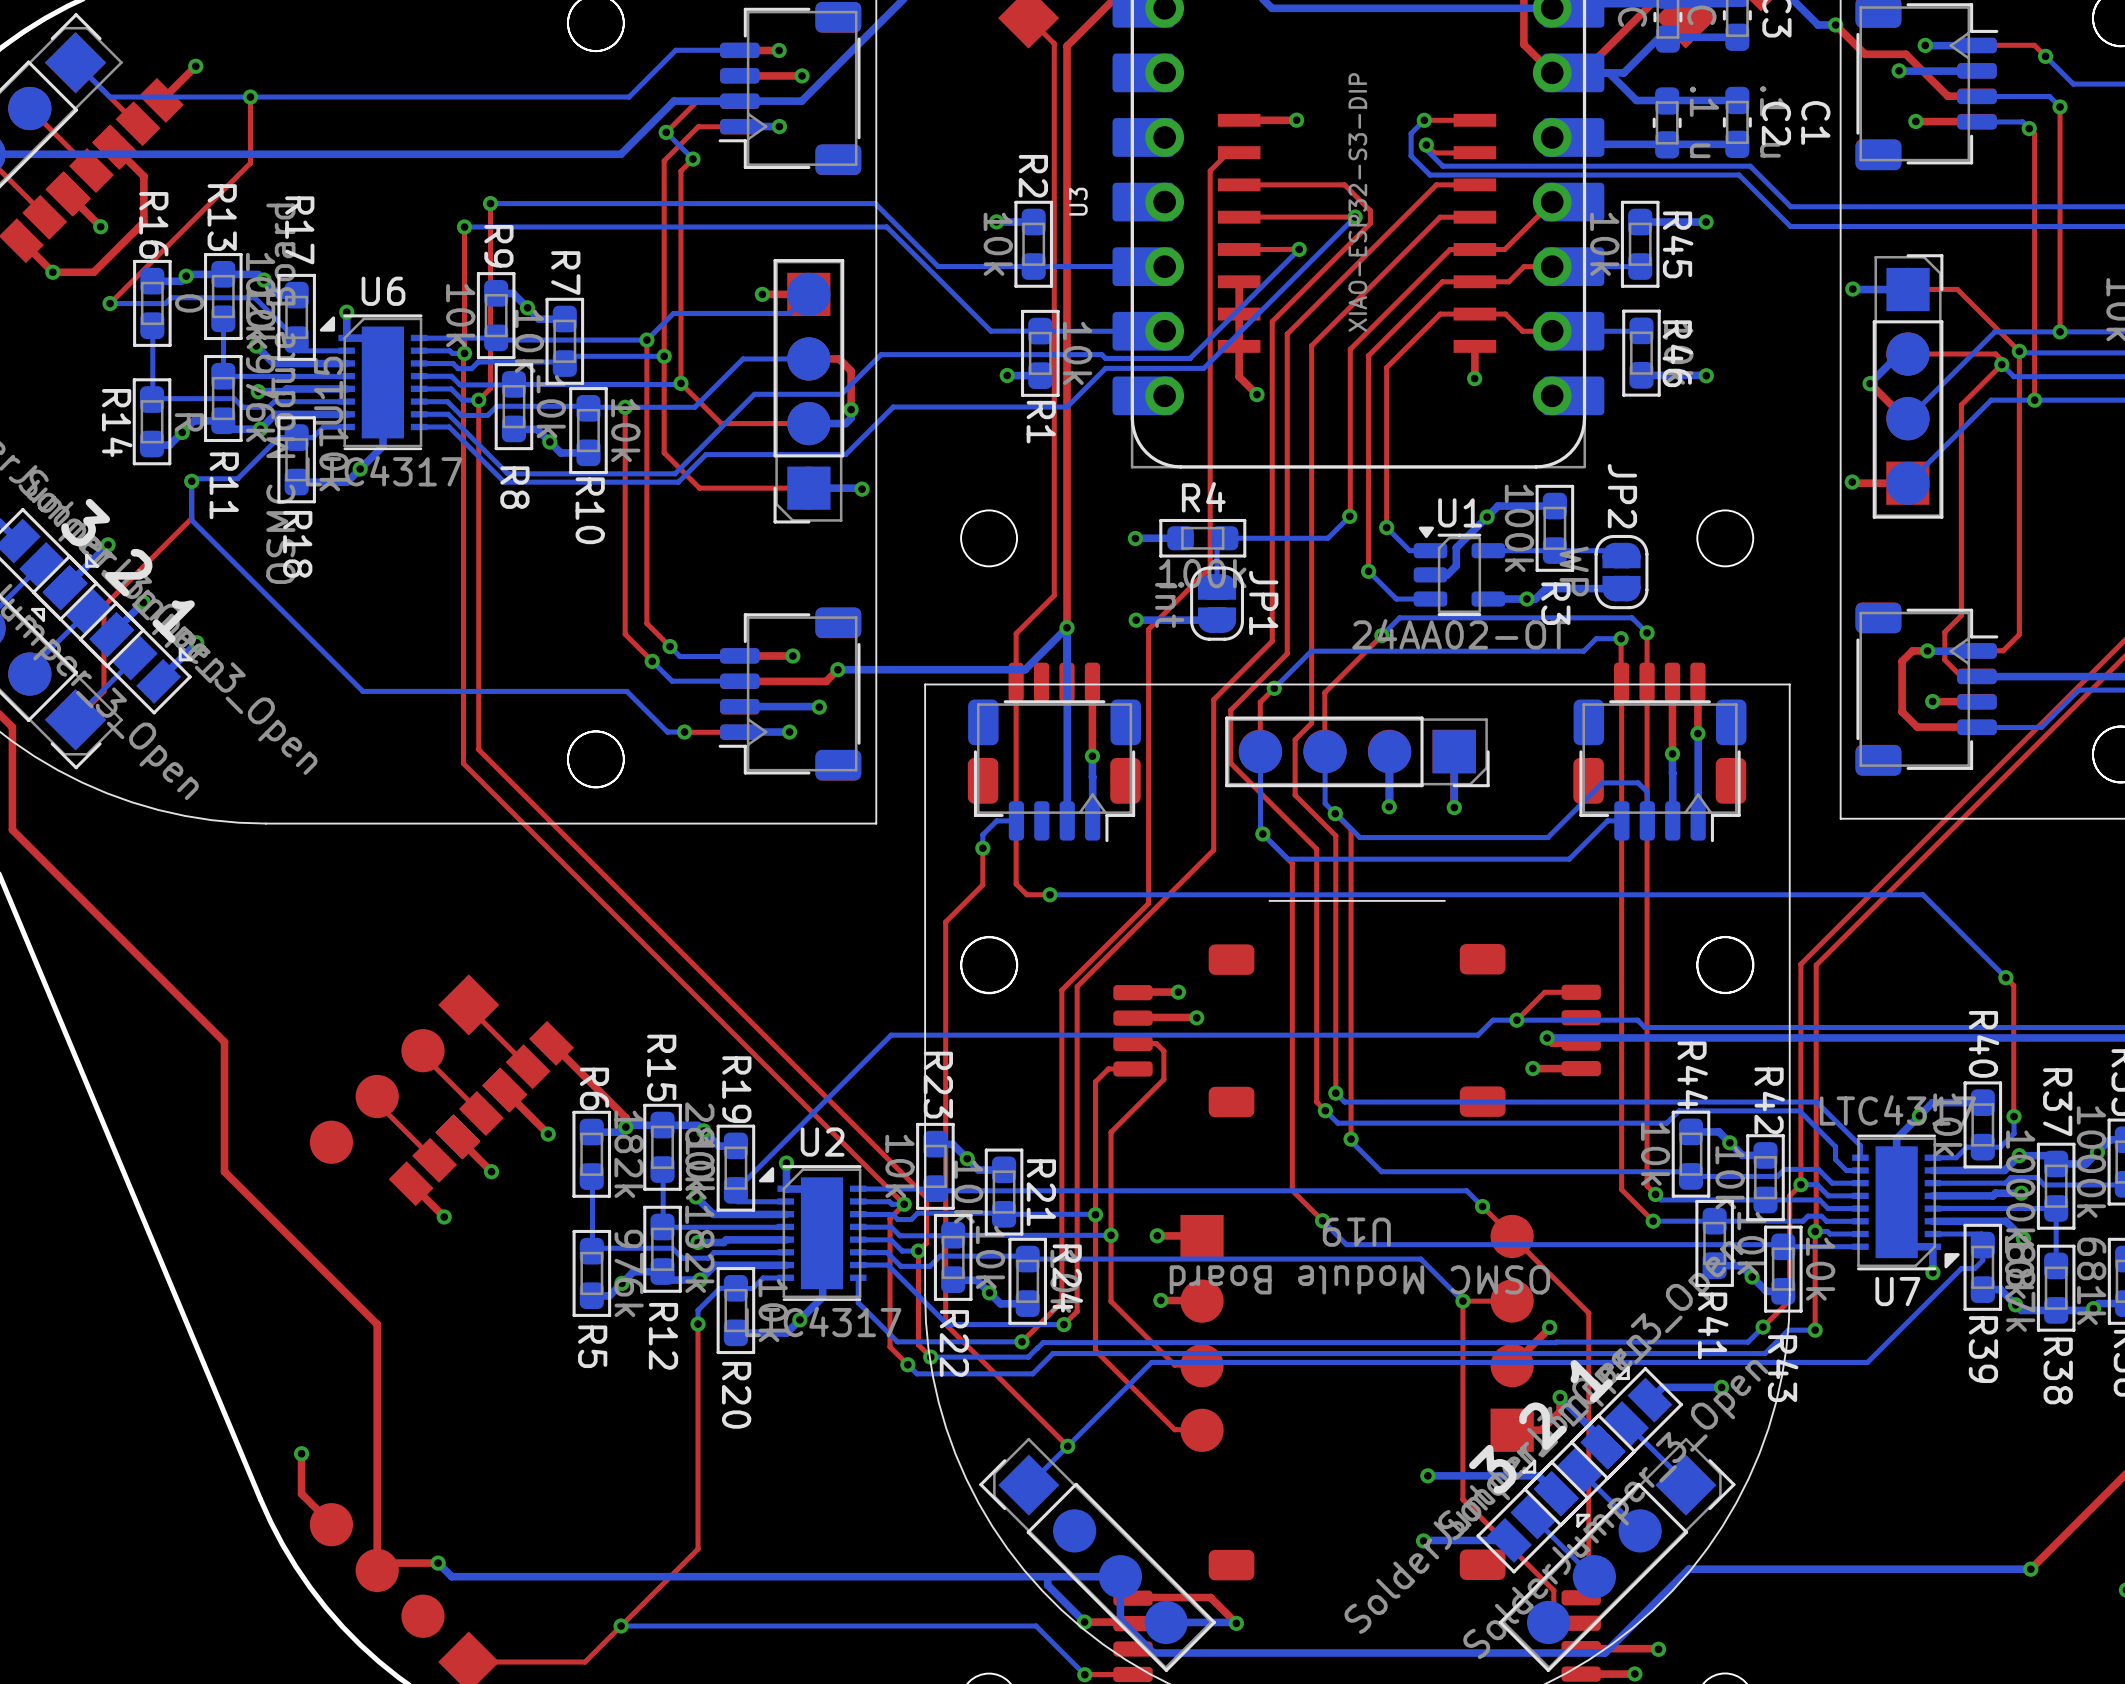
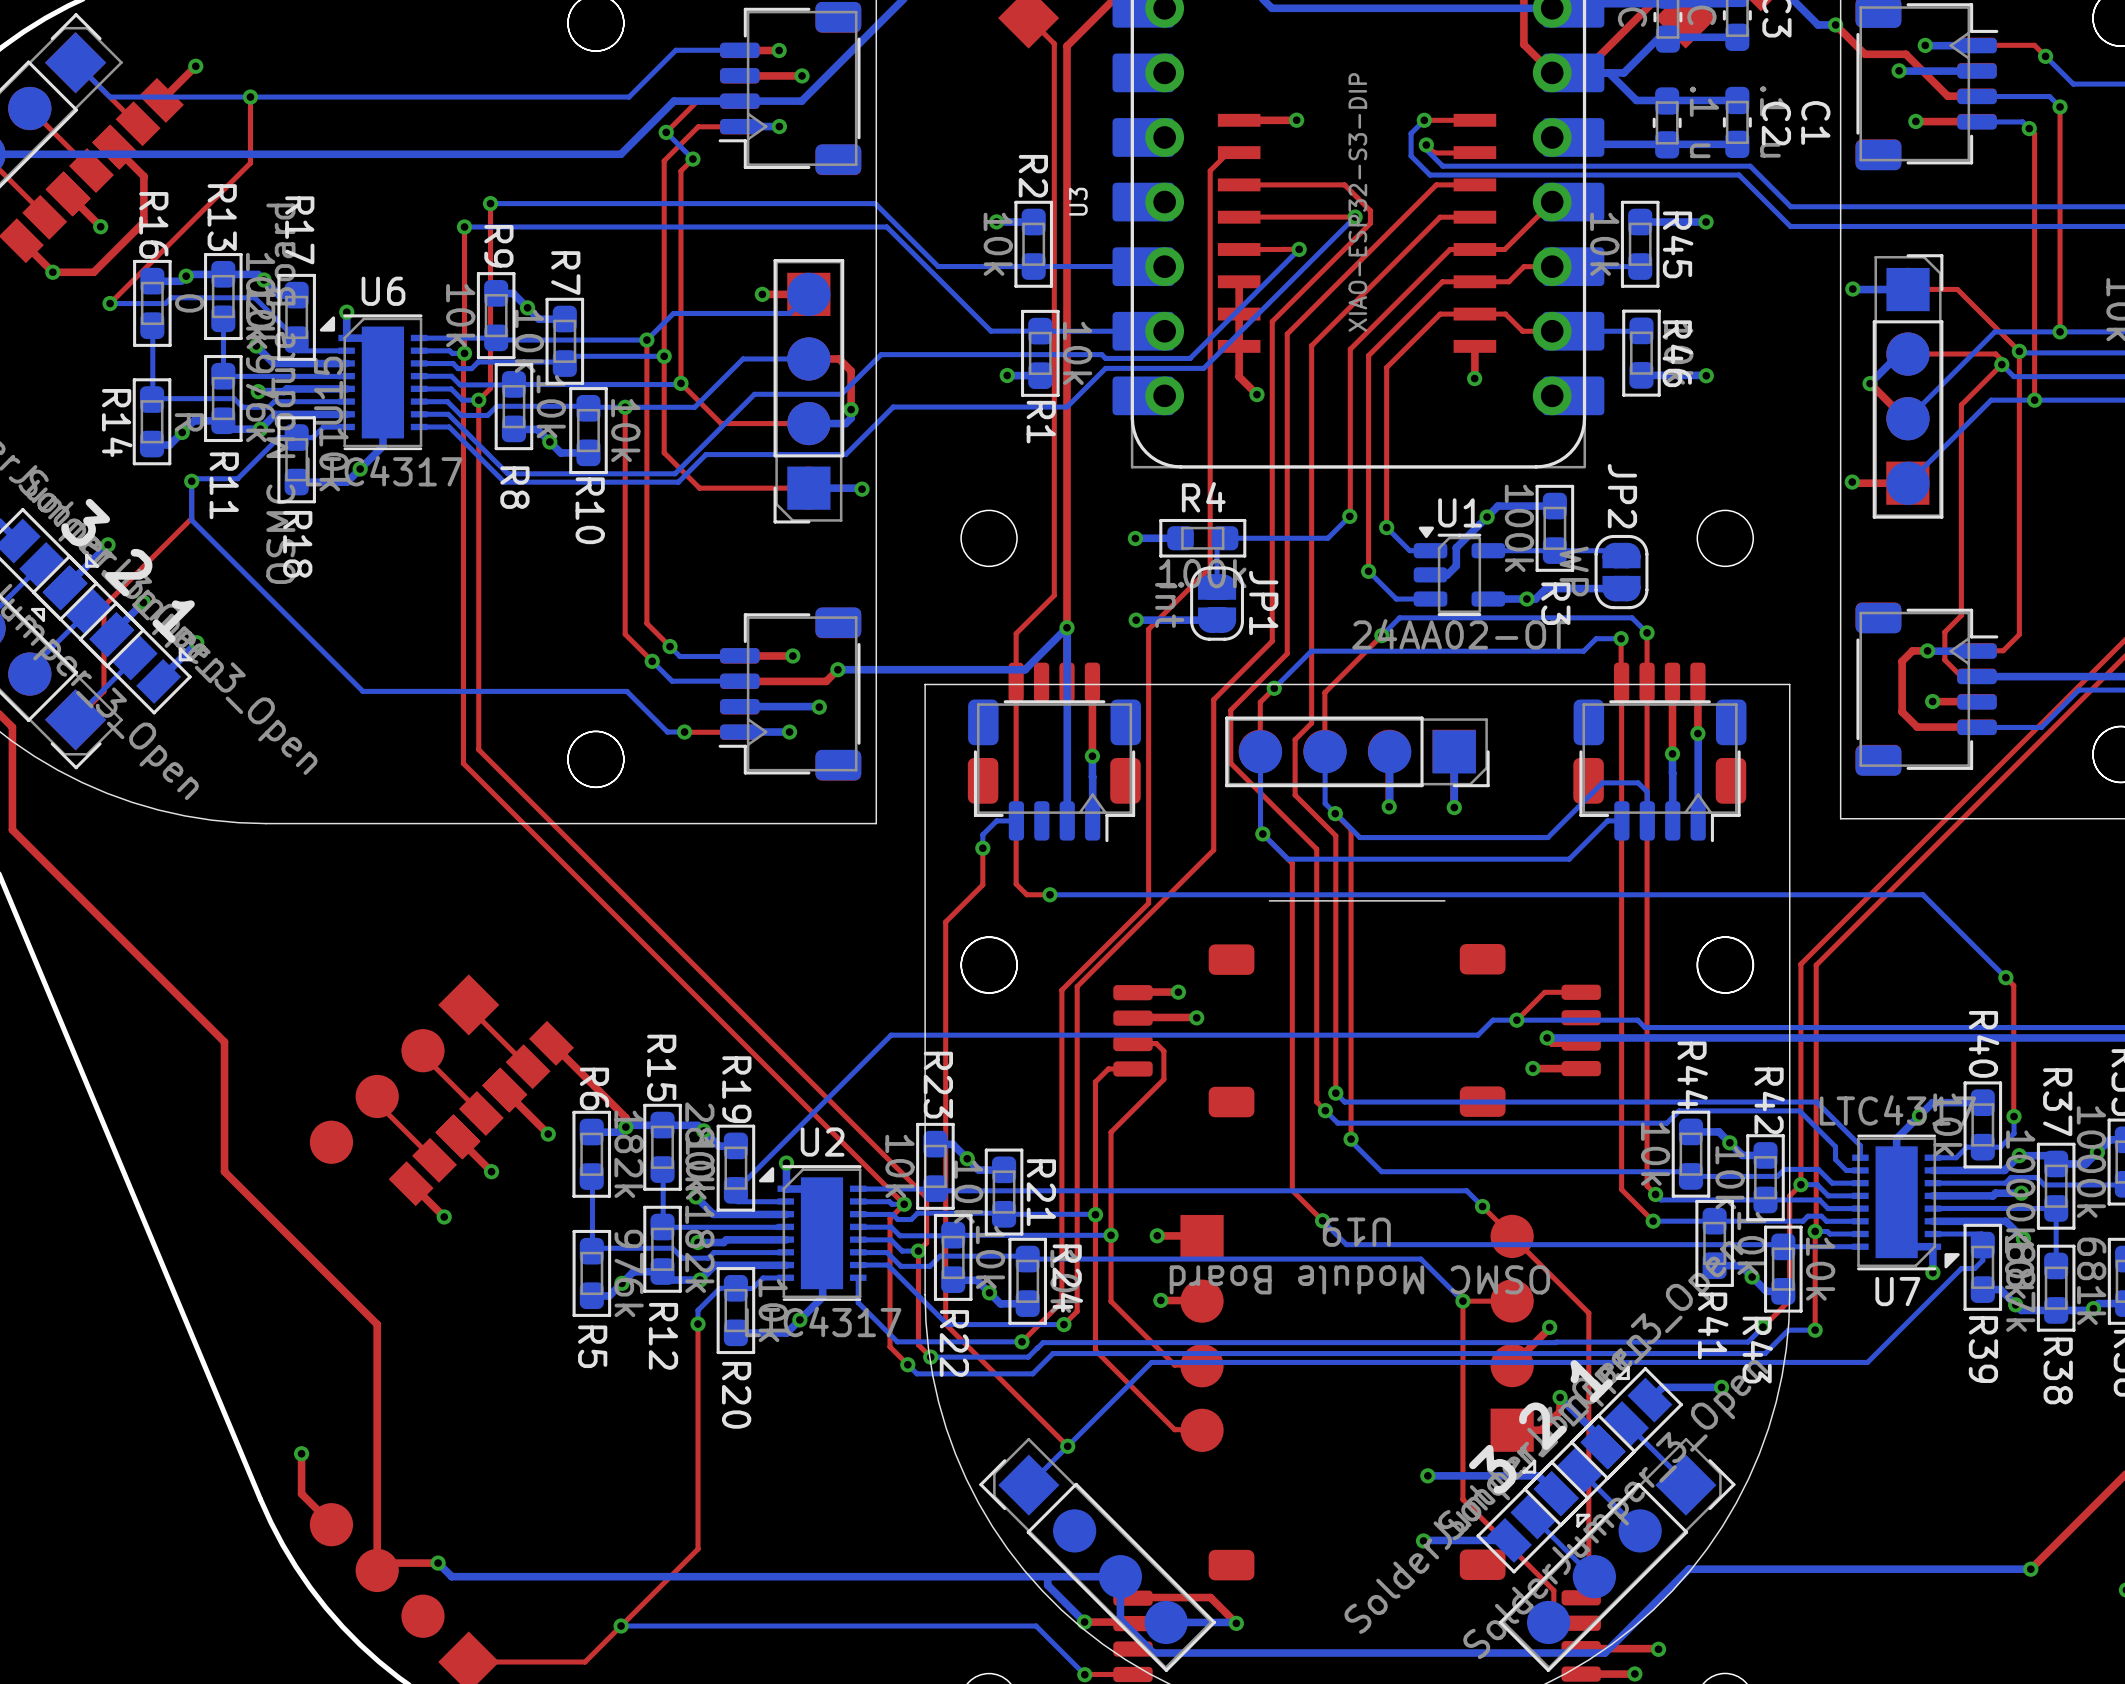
R43 name position: R43 (1783, 1368) -> R43 (1757, 1350)

